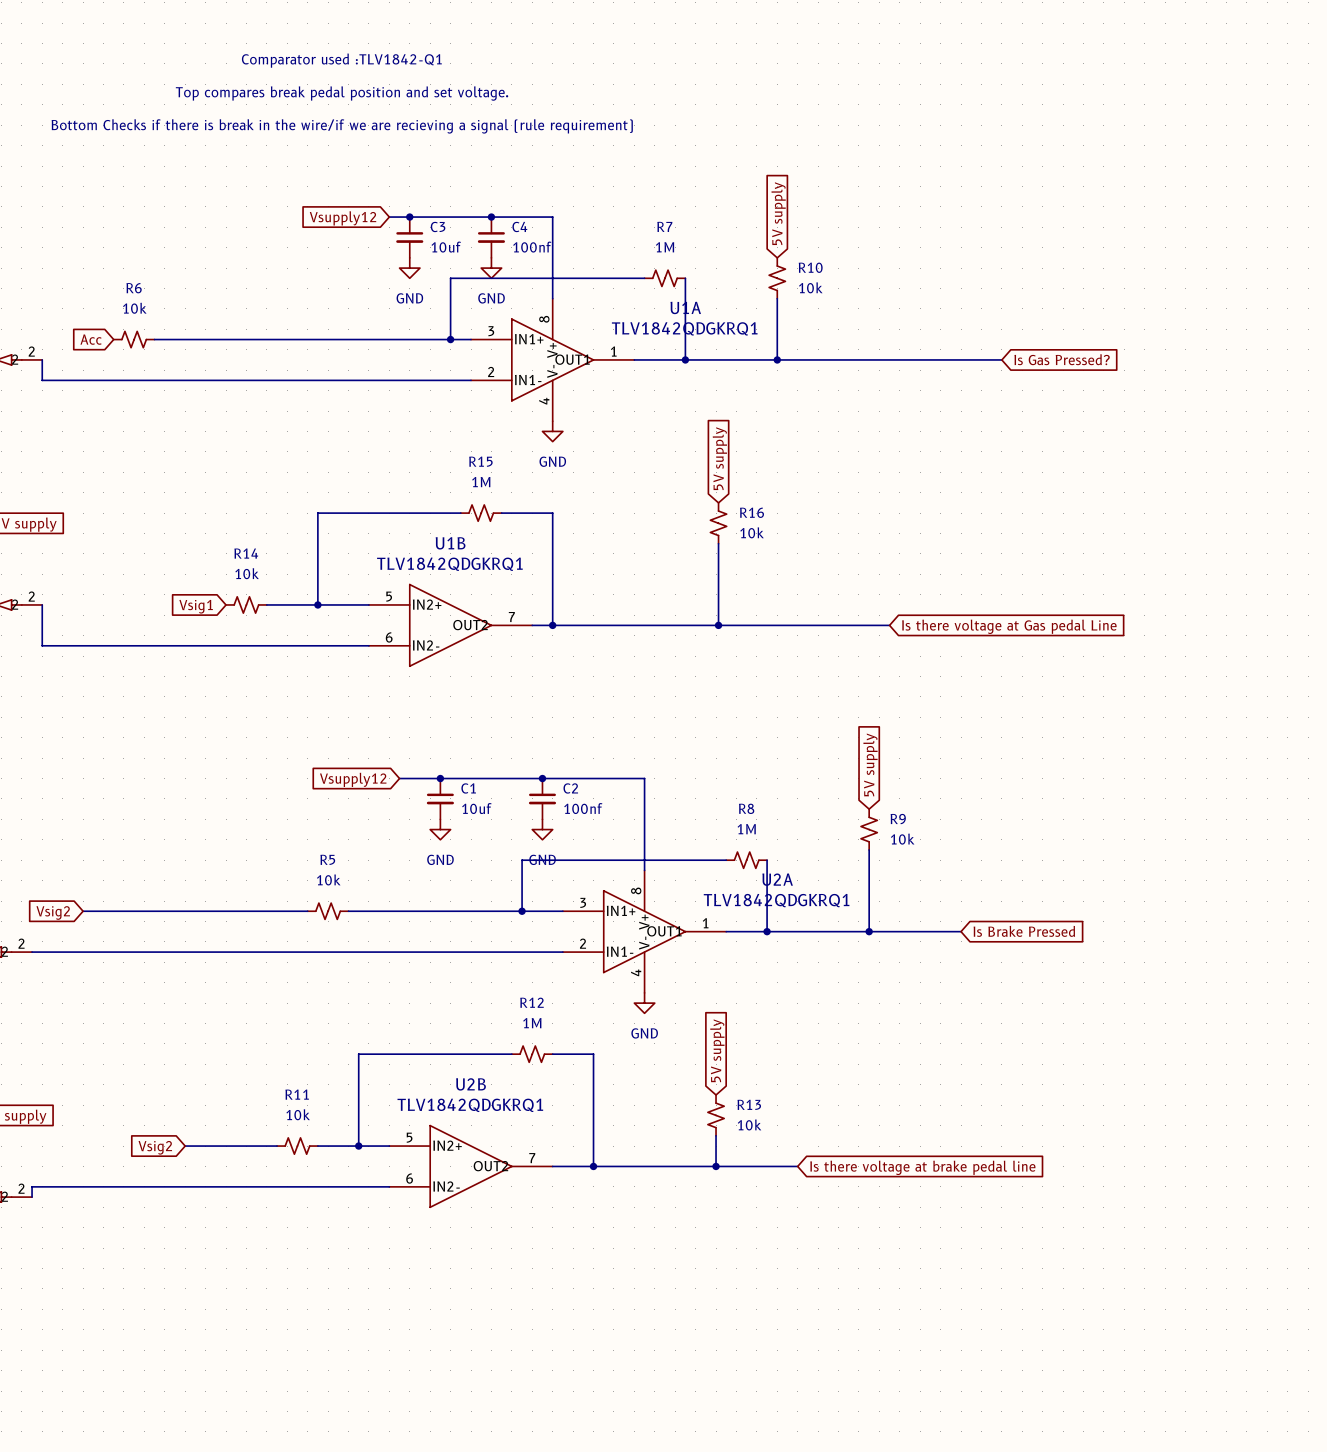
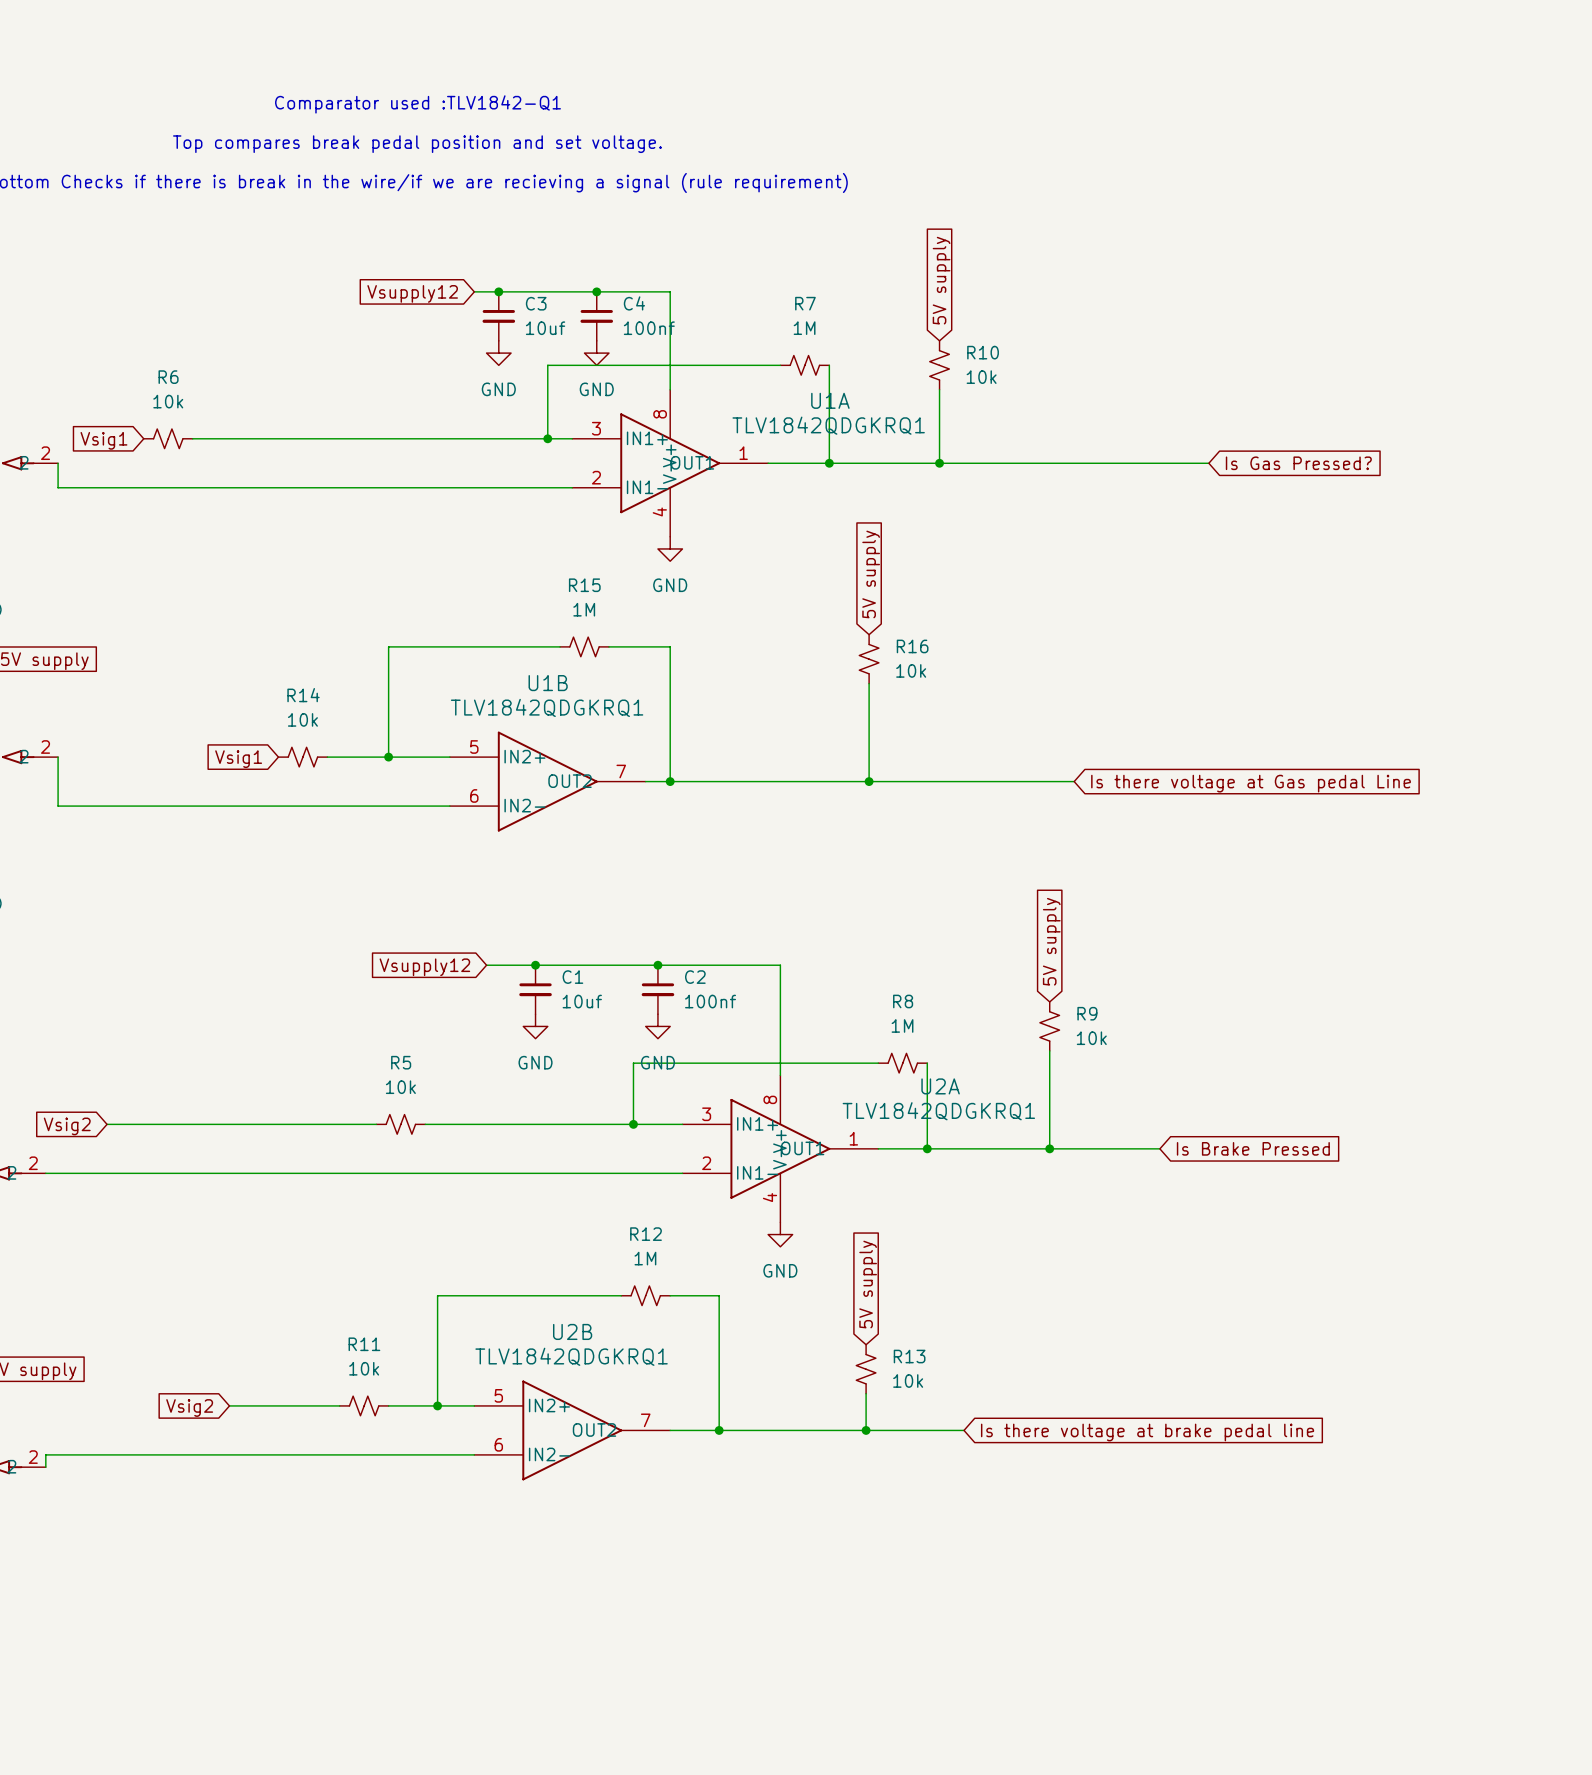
global label: Acc (91, 339) -> Vsig1 (103, 440)

